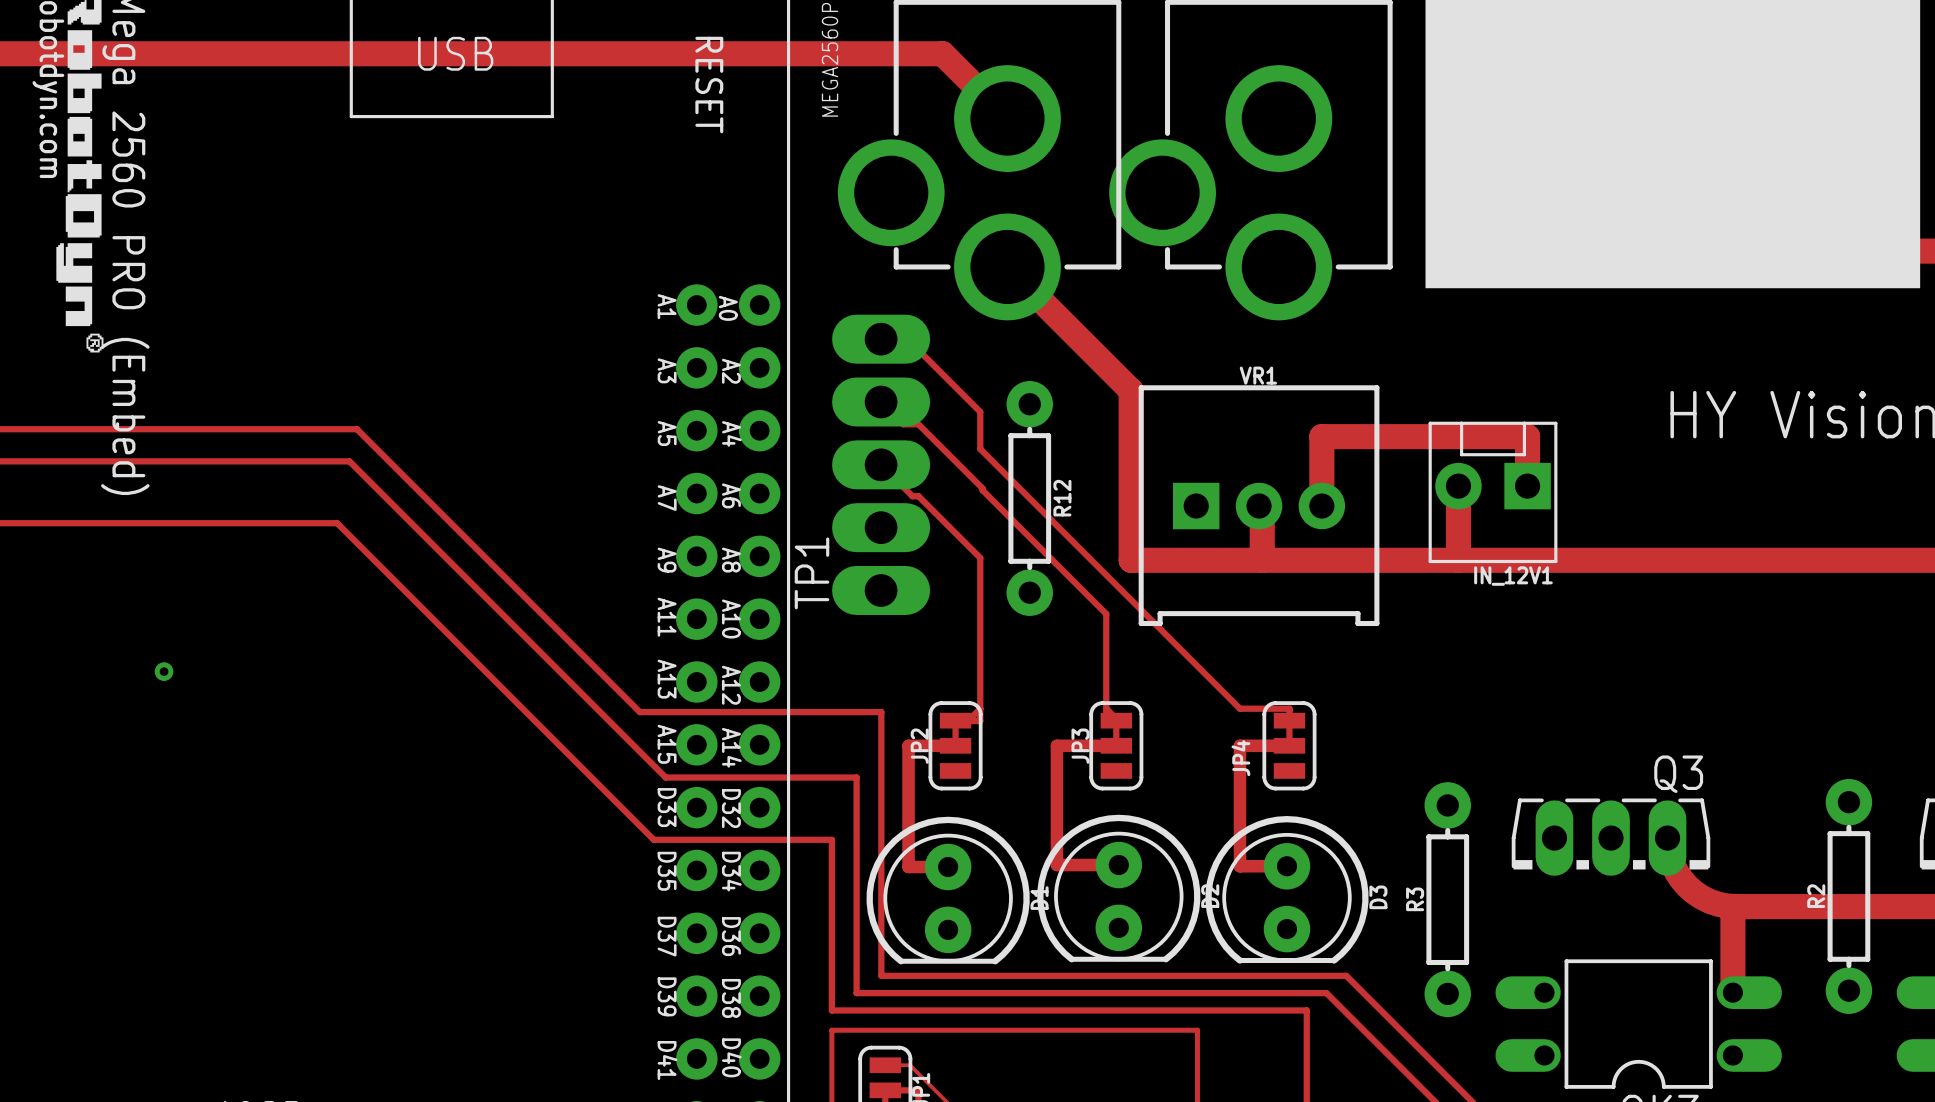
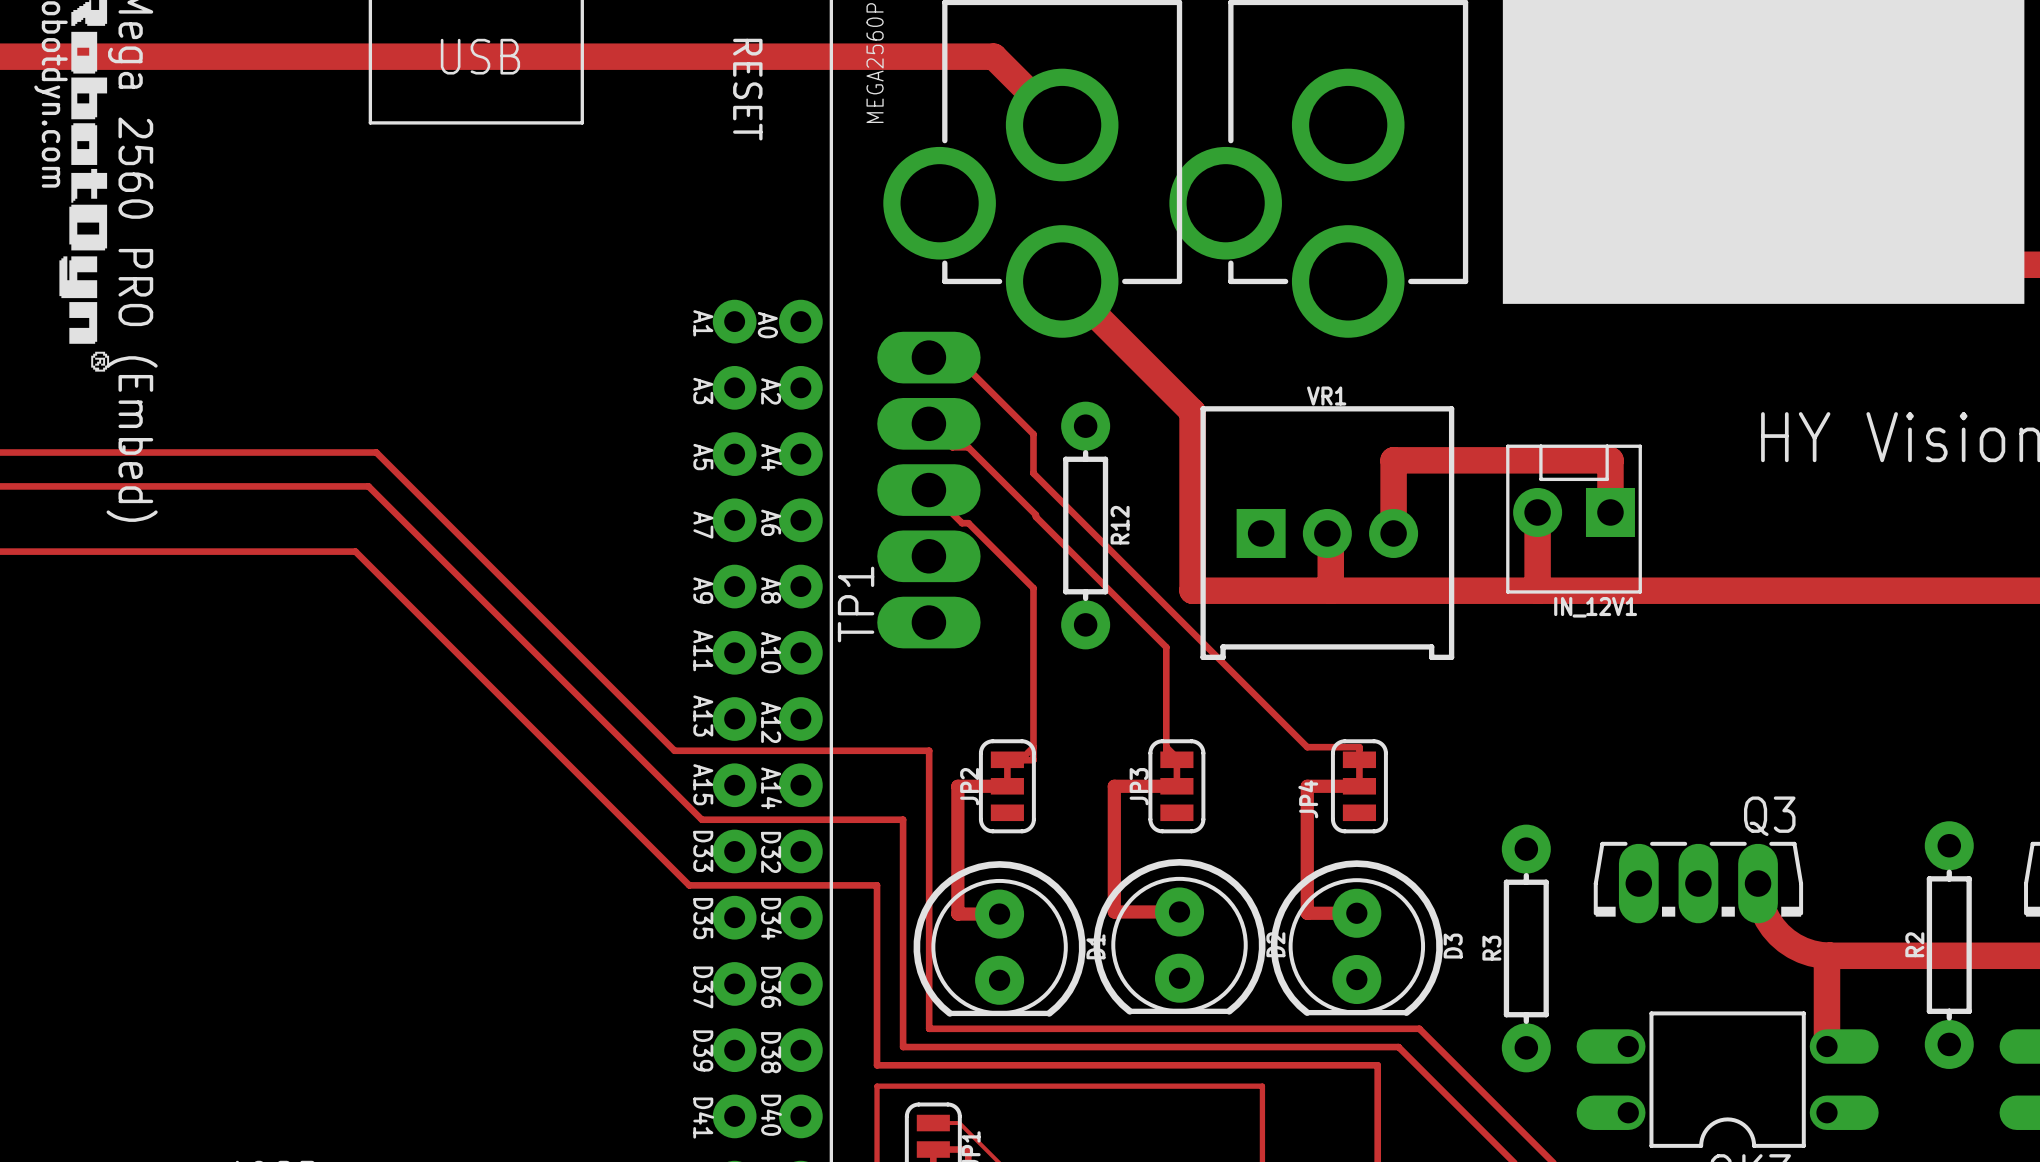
via: (164, 671) -> none

